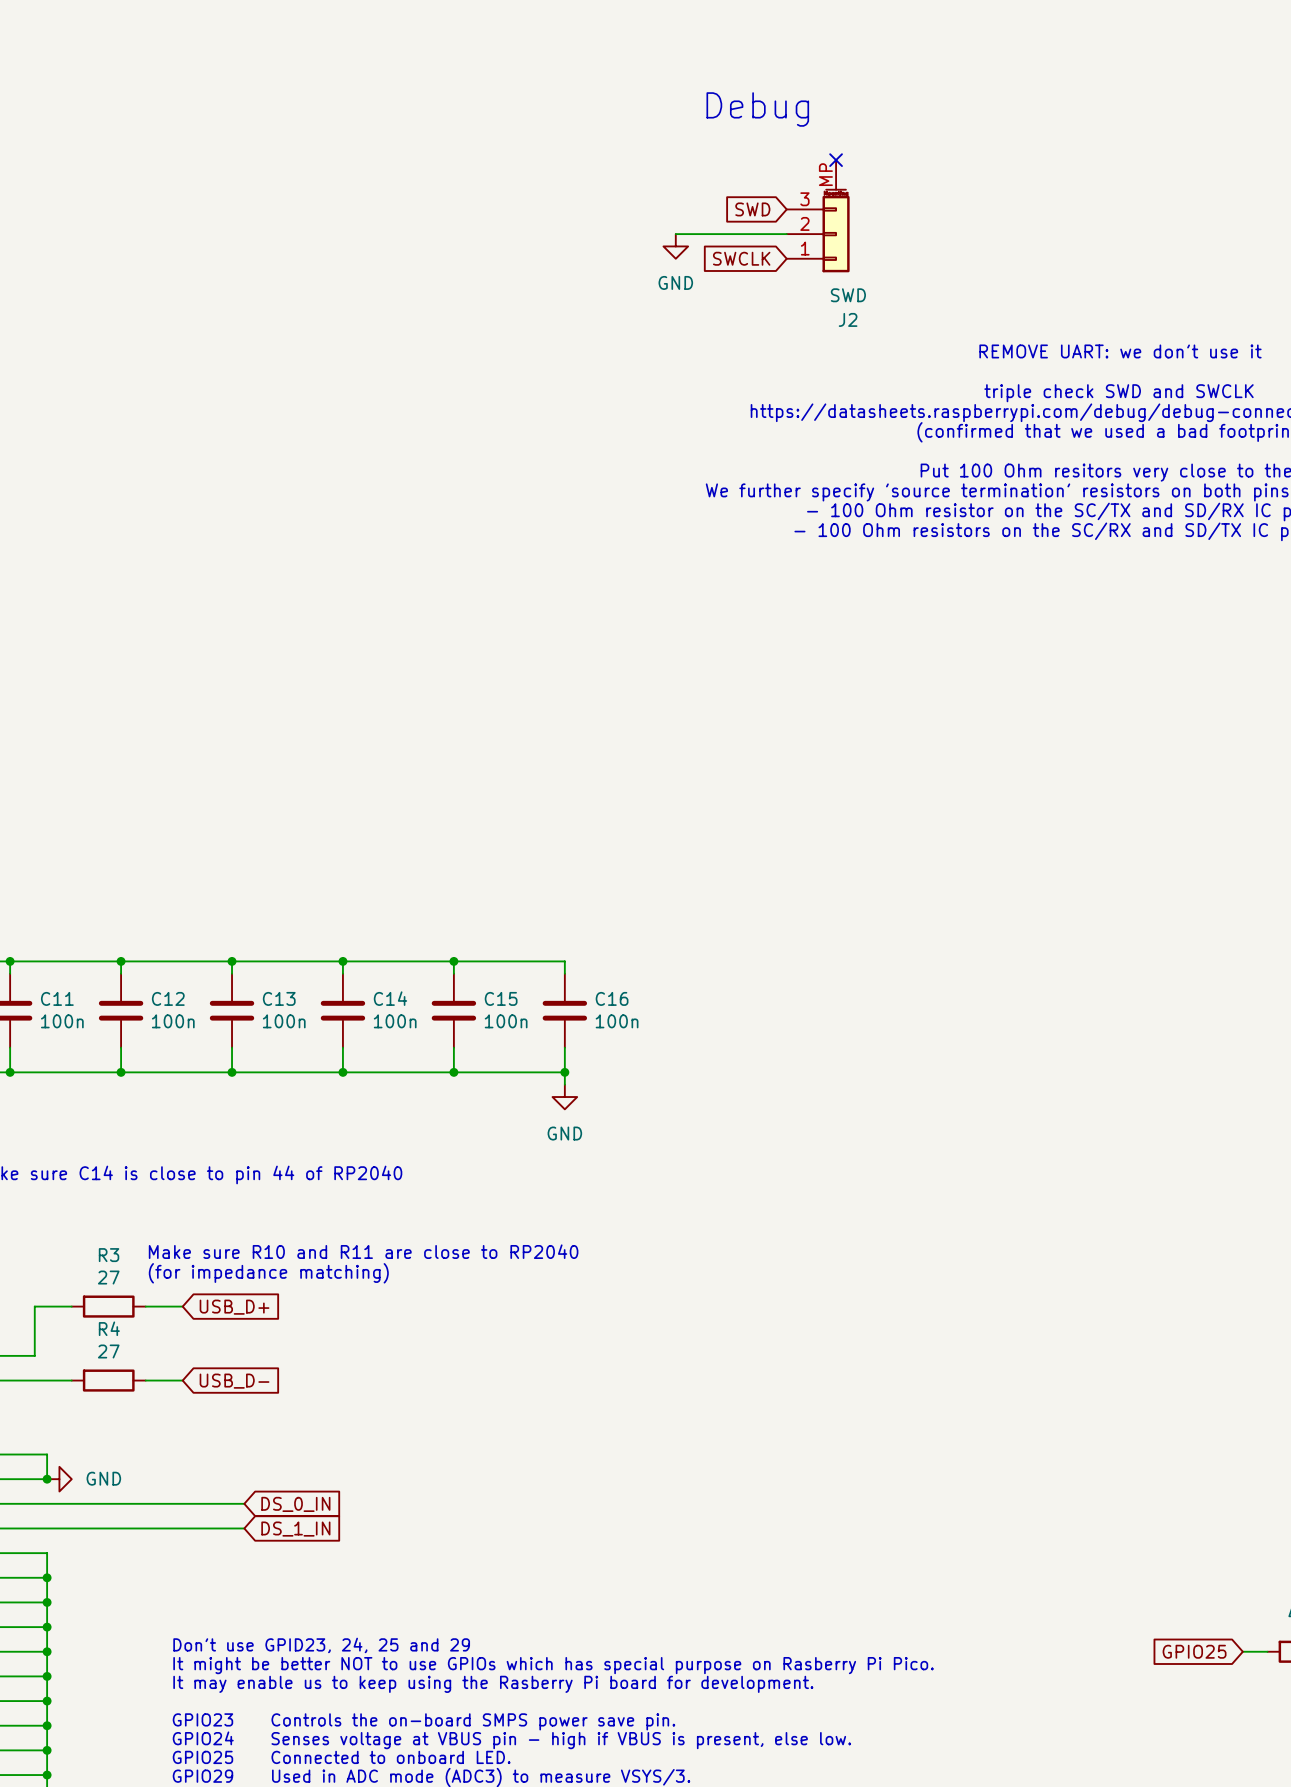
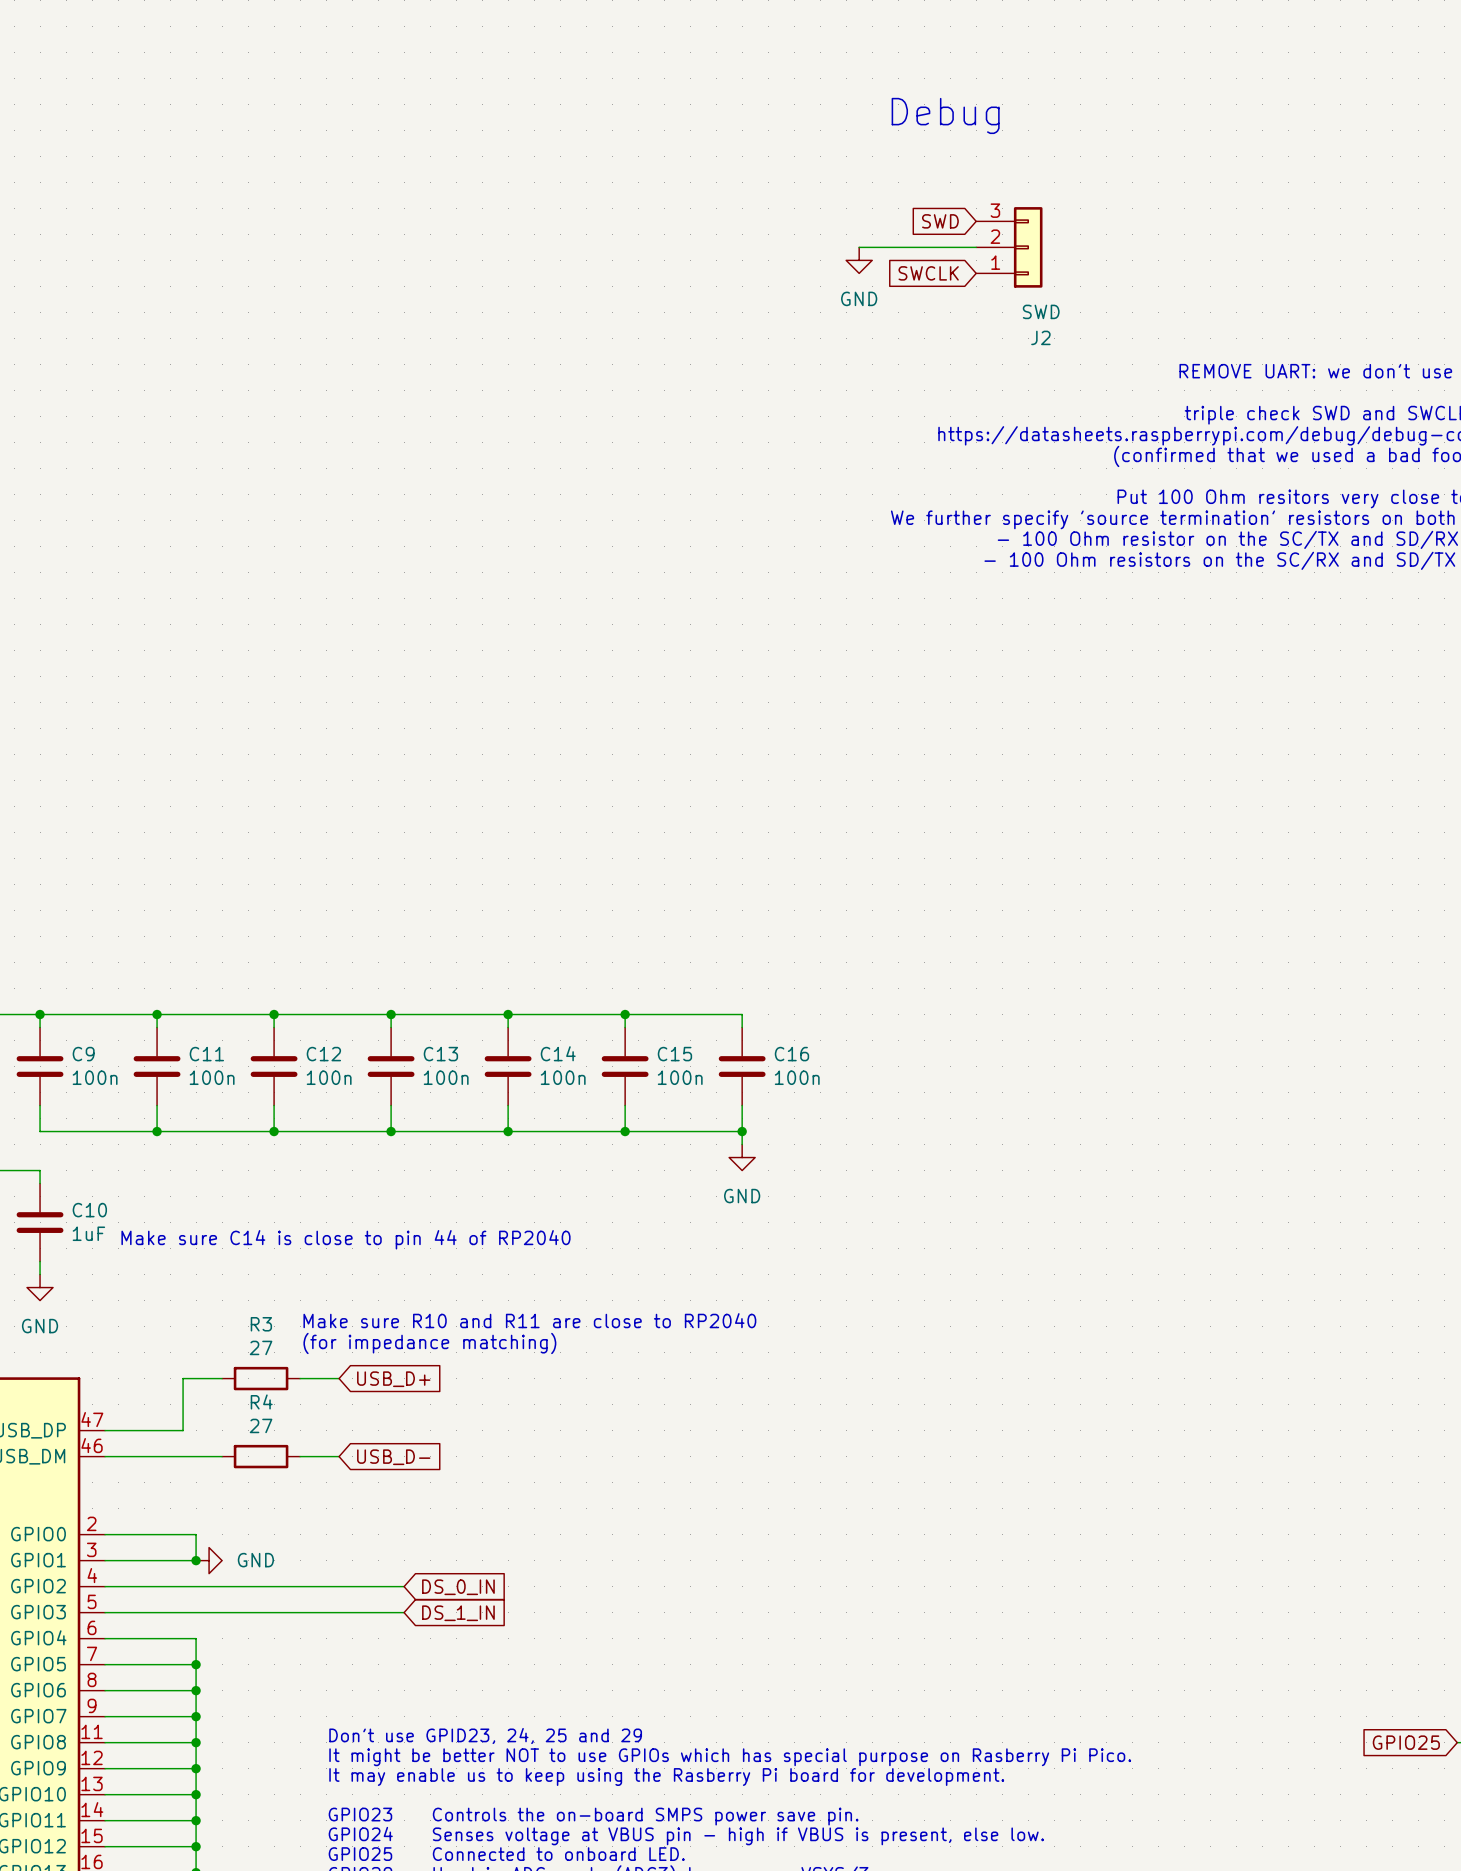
J2 symbol: [786, 160, 850, 273] -> [976, 207, 1043, 288]
no-connect mark: (836, 160) -> none

